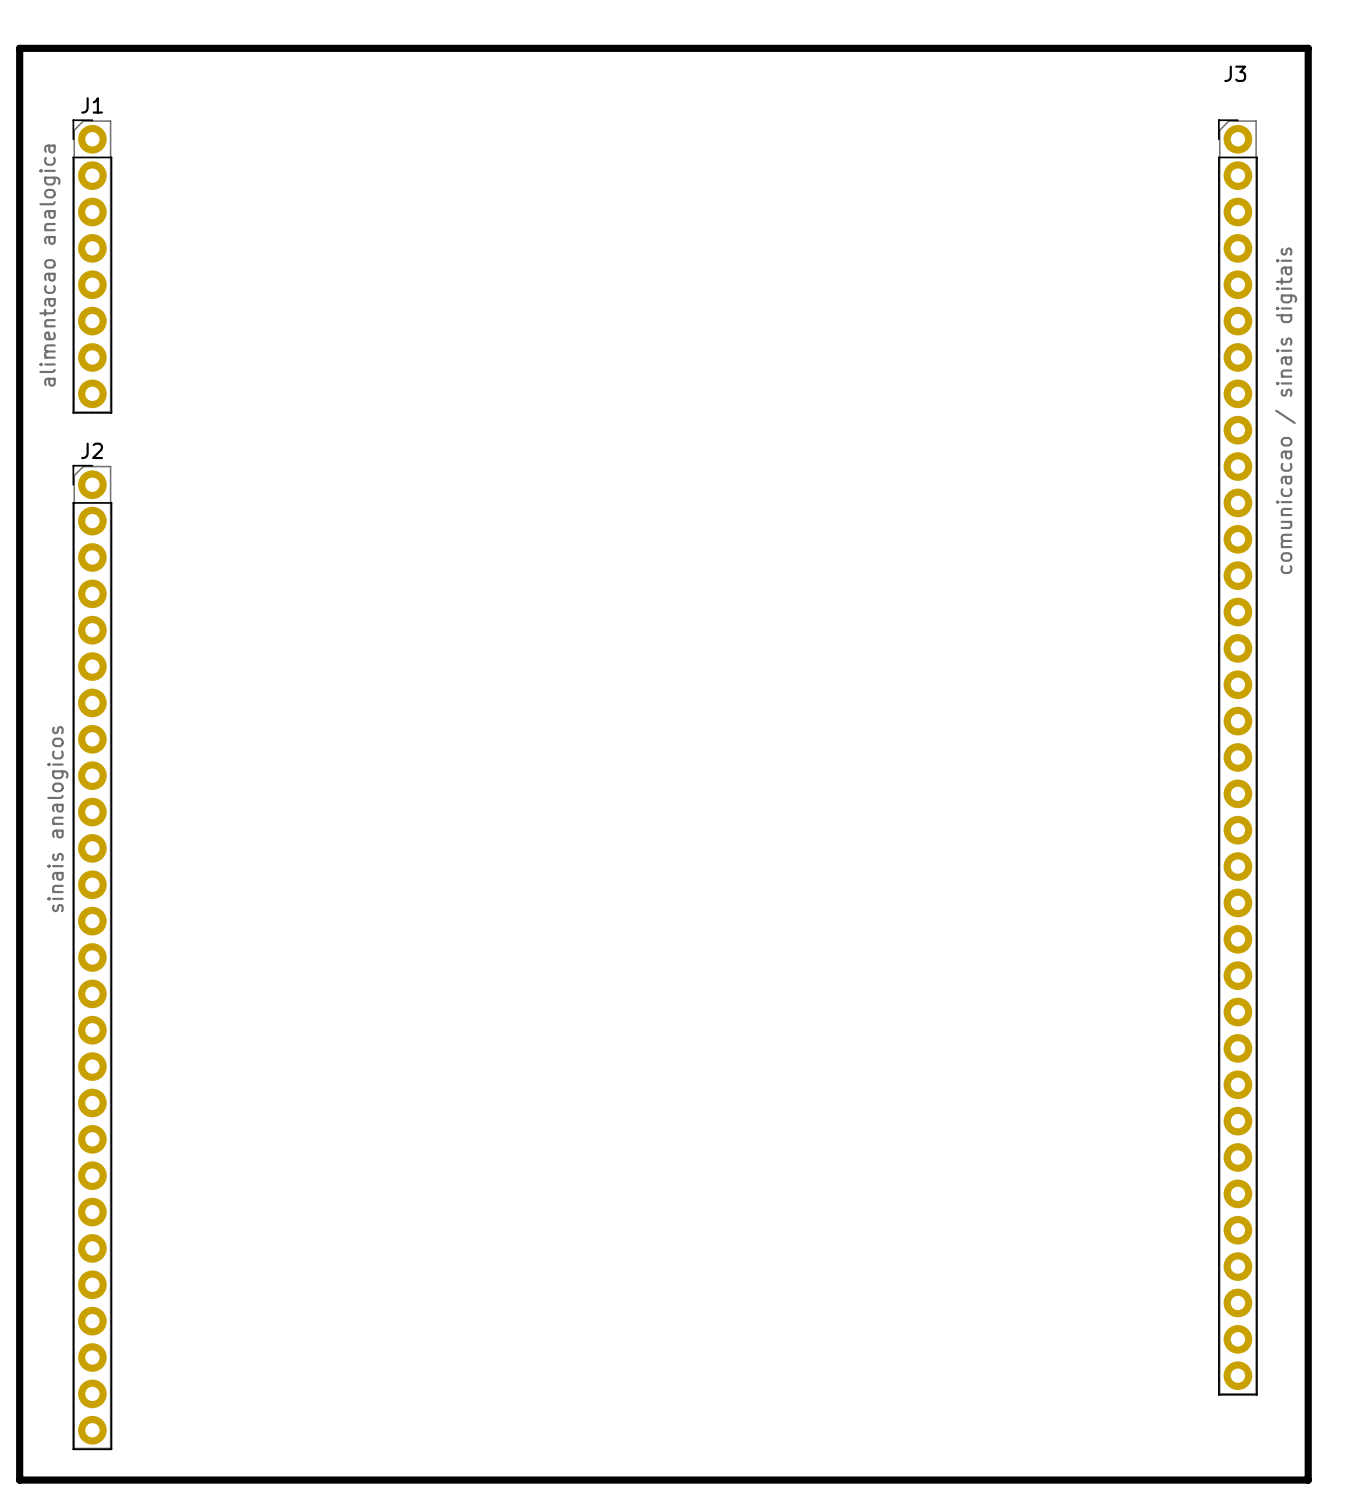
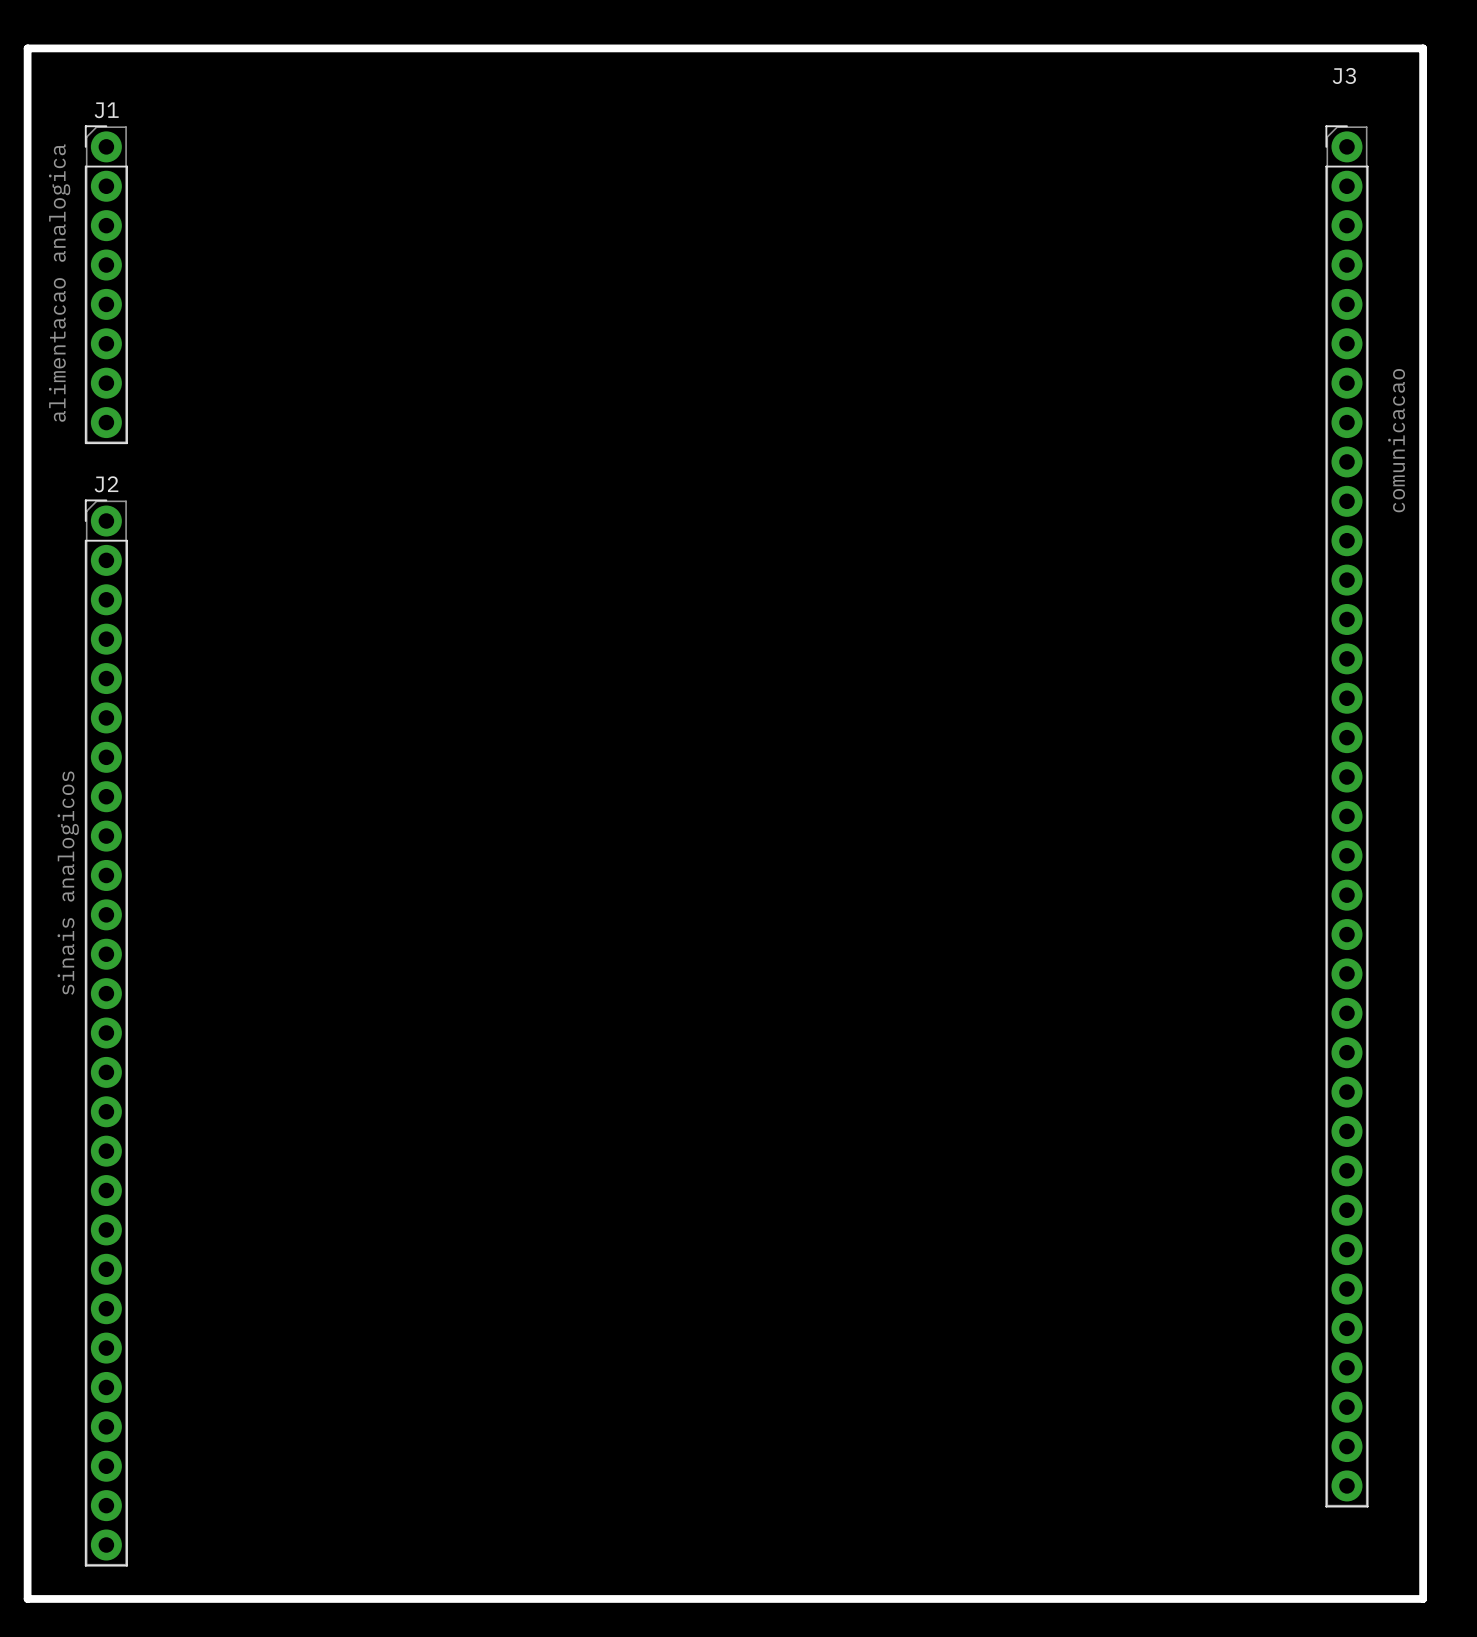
J3 text: comunicacao / sinais digitais (1286, 410) -> comunicacao (1396, 440)

